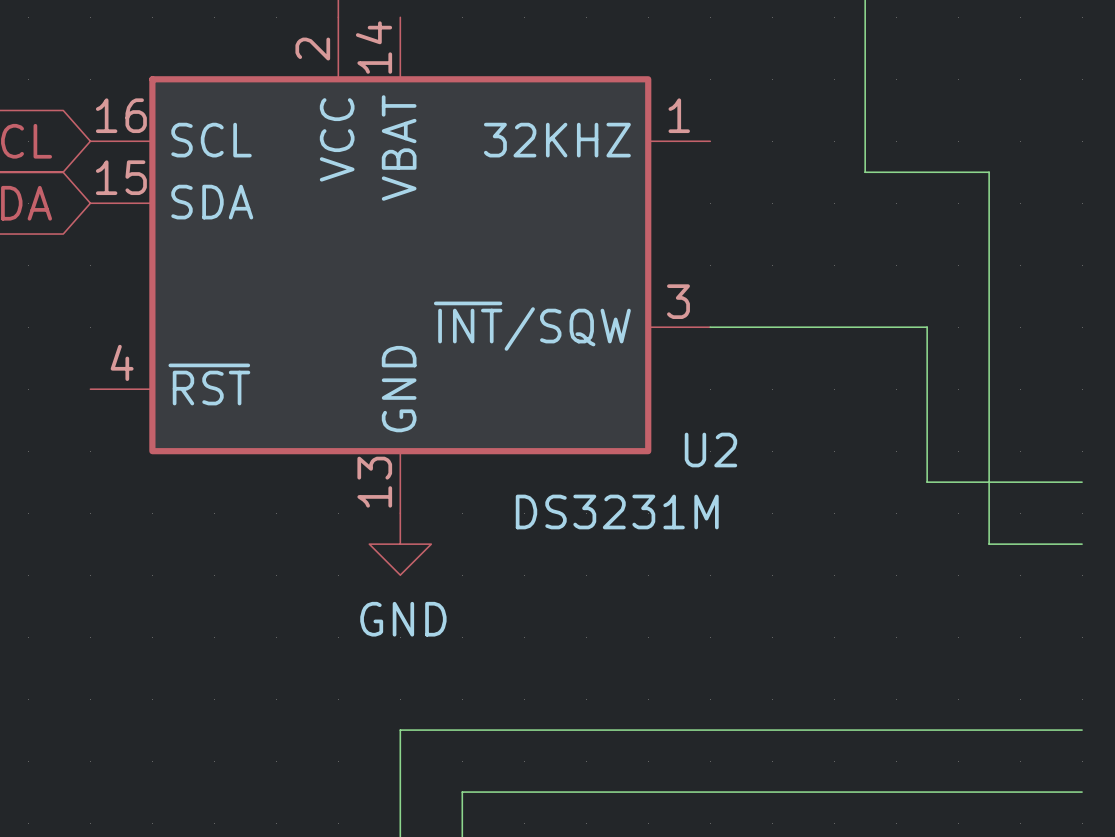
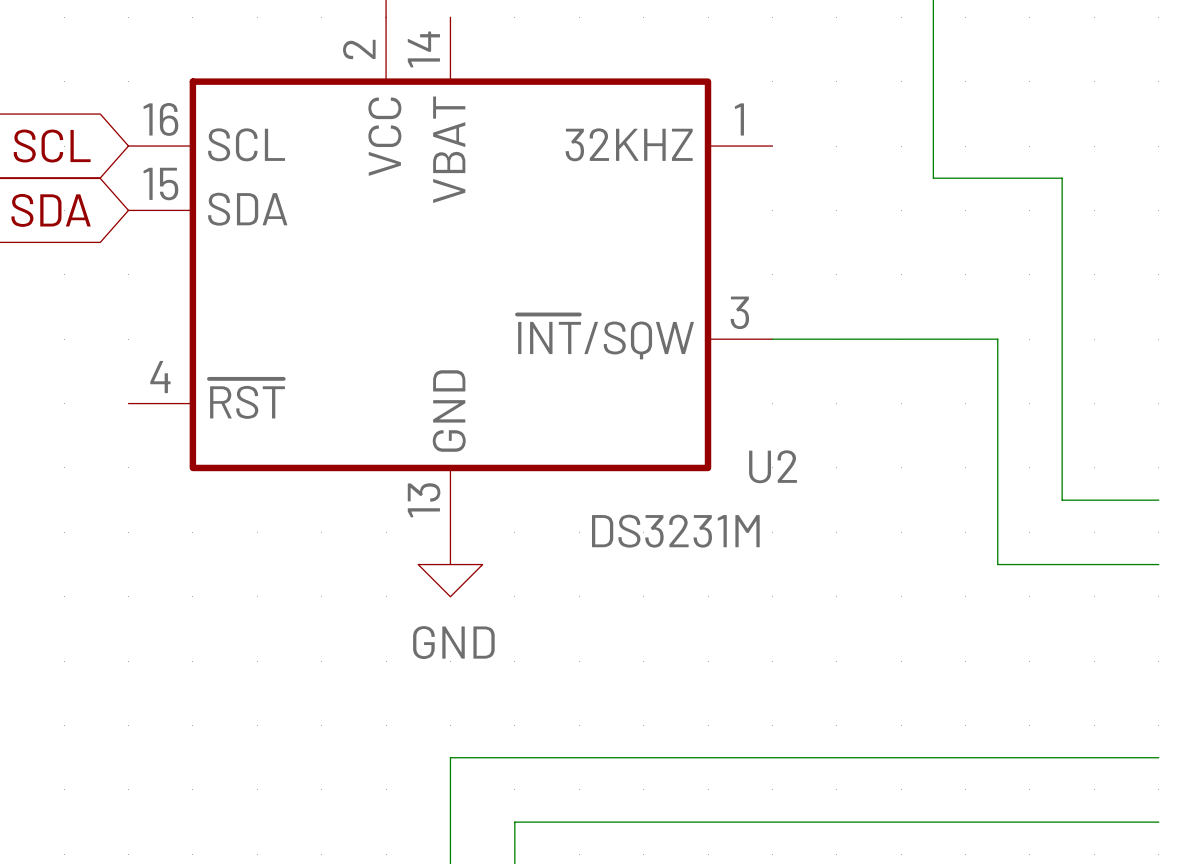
wire: (927, 482) (989, 482) (989, 544) -> (997, 500) (997, 564) (1062, 564)

